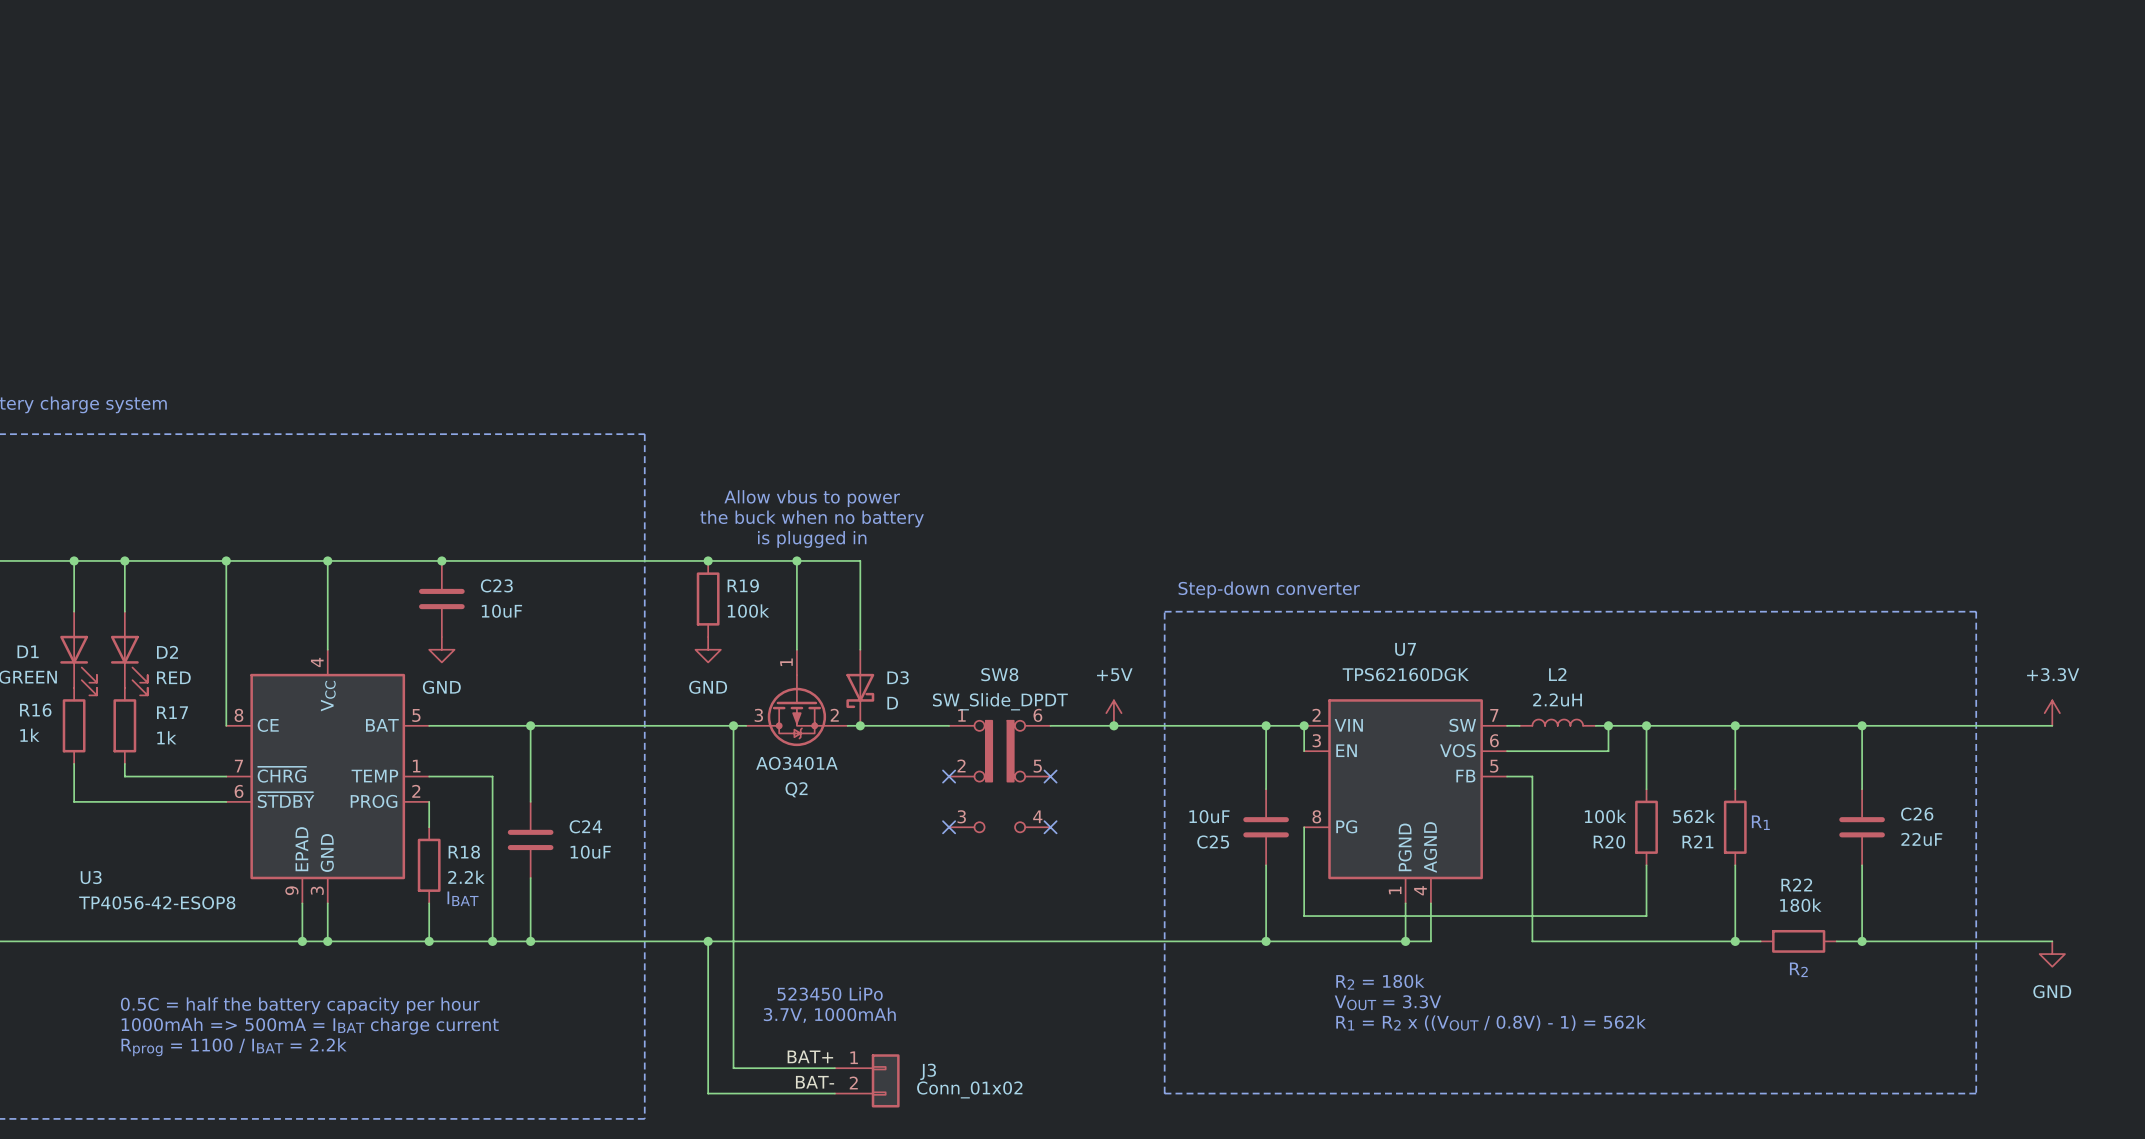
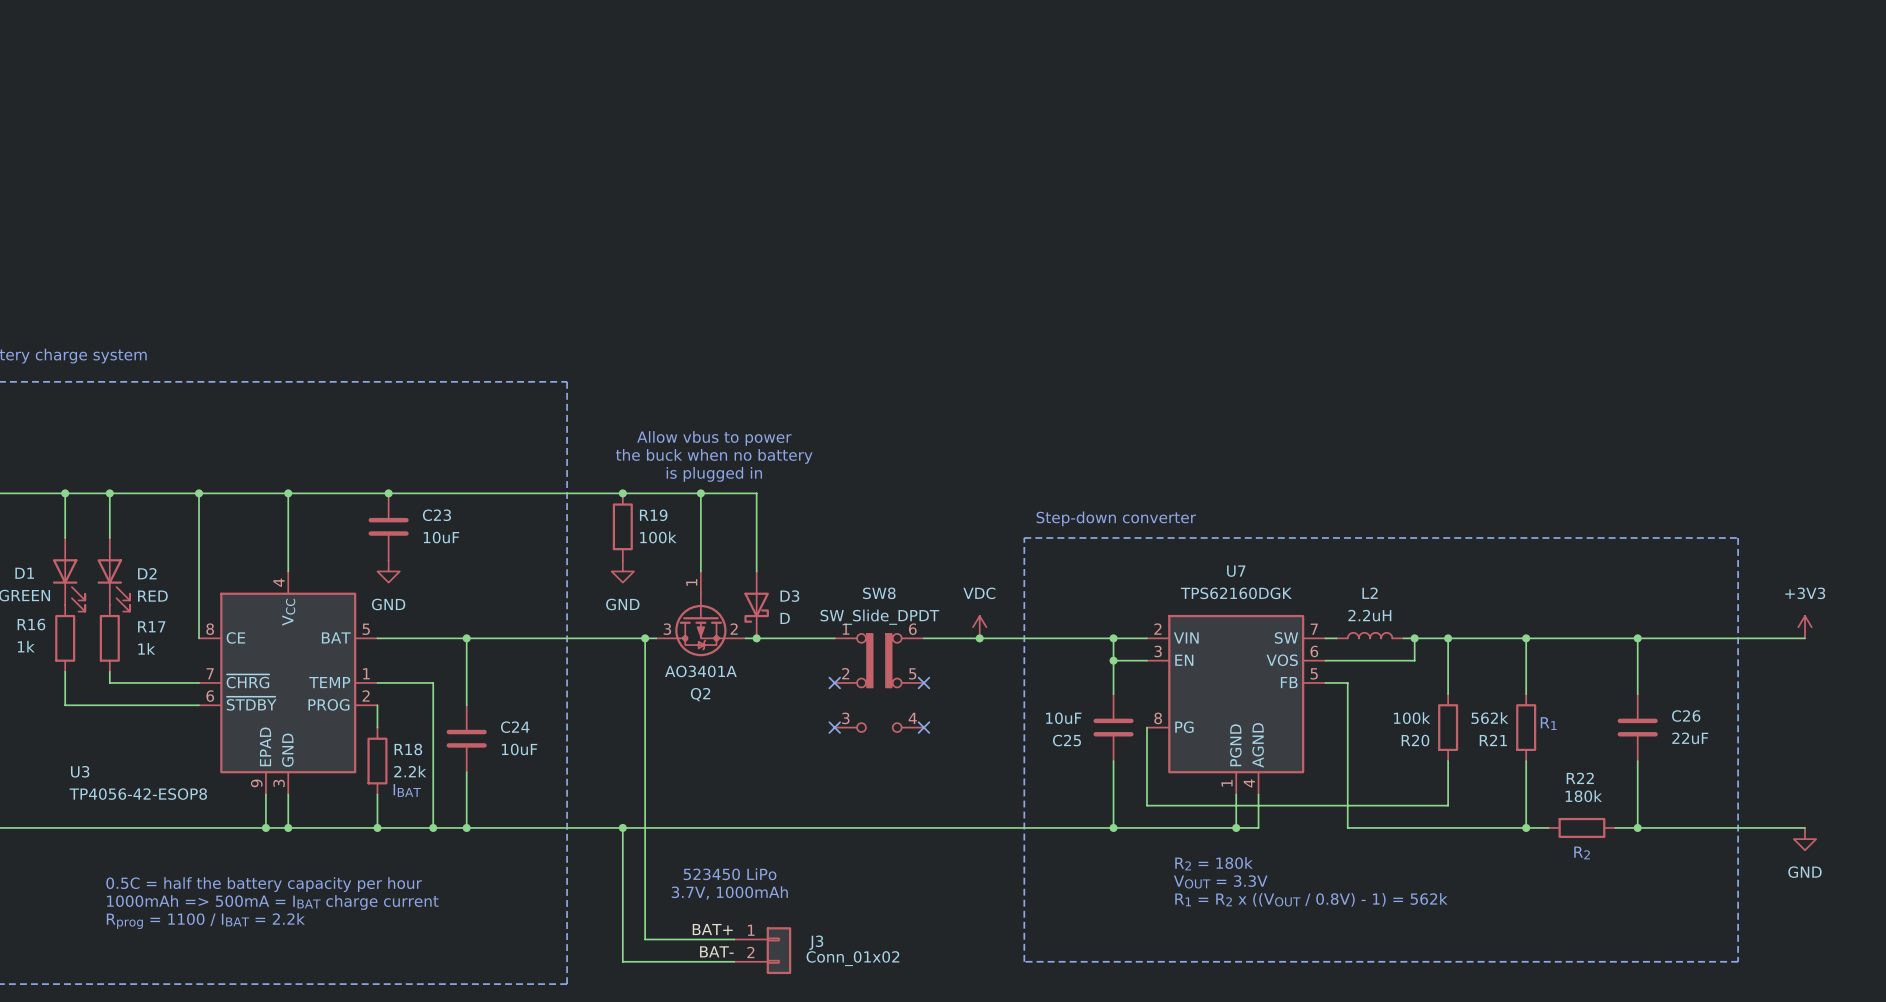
power symbol: +5V (1113, 713) -> VDC (979, 627)
power symbol: +3.3V (2052, 713) -> +3V3 (1805, 627)
wire: (1304, 725) (1304, 751) -> (1113, 660) (1147, 660)
junction position: (1304, 725) -> (1113, 660)

